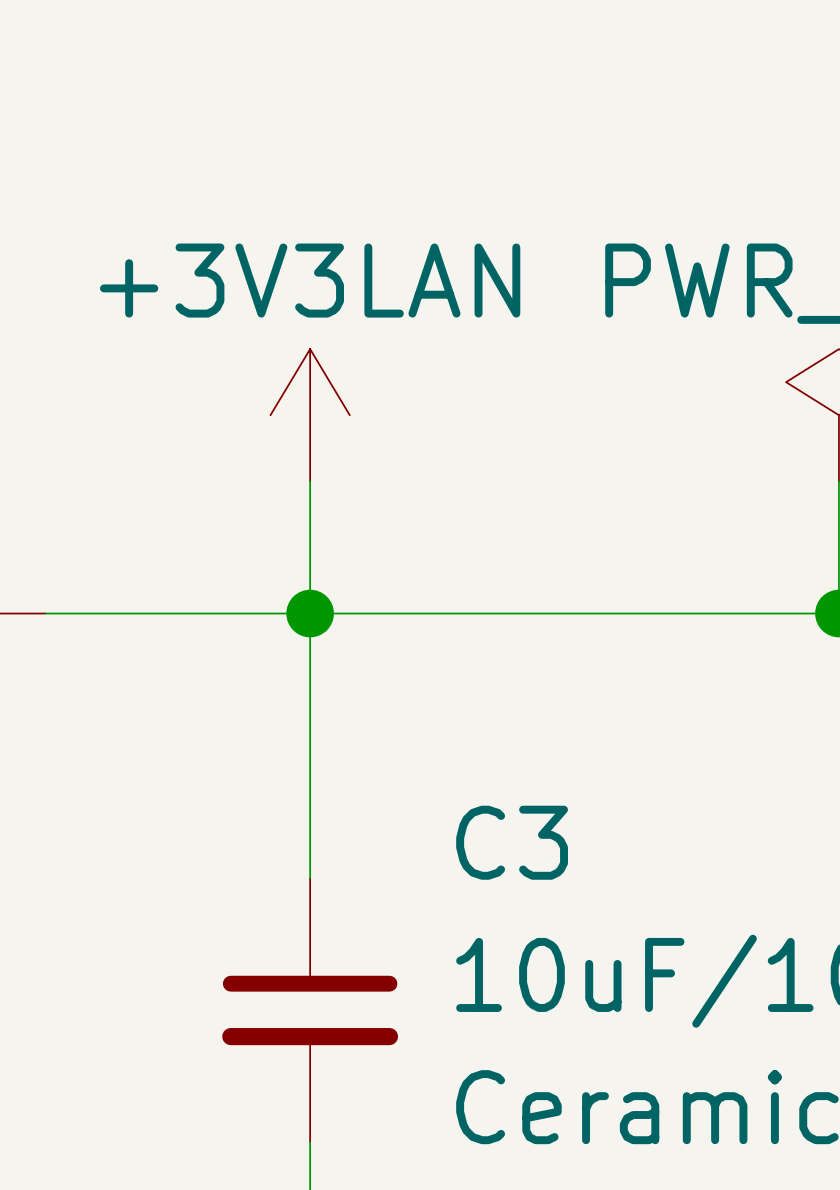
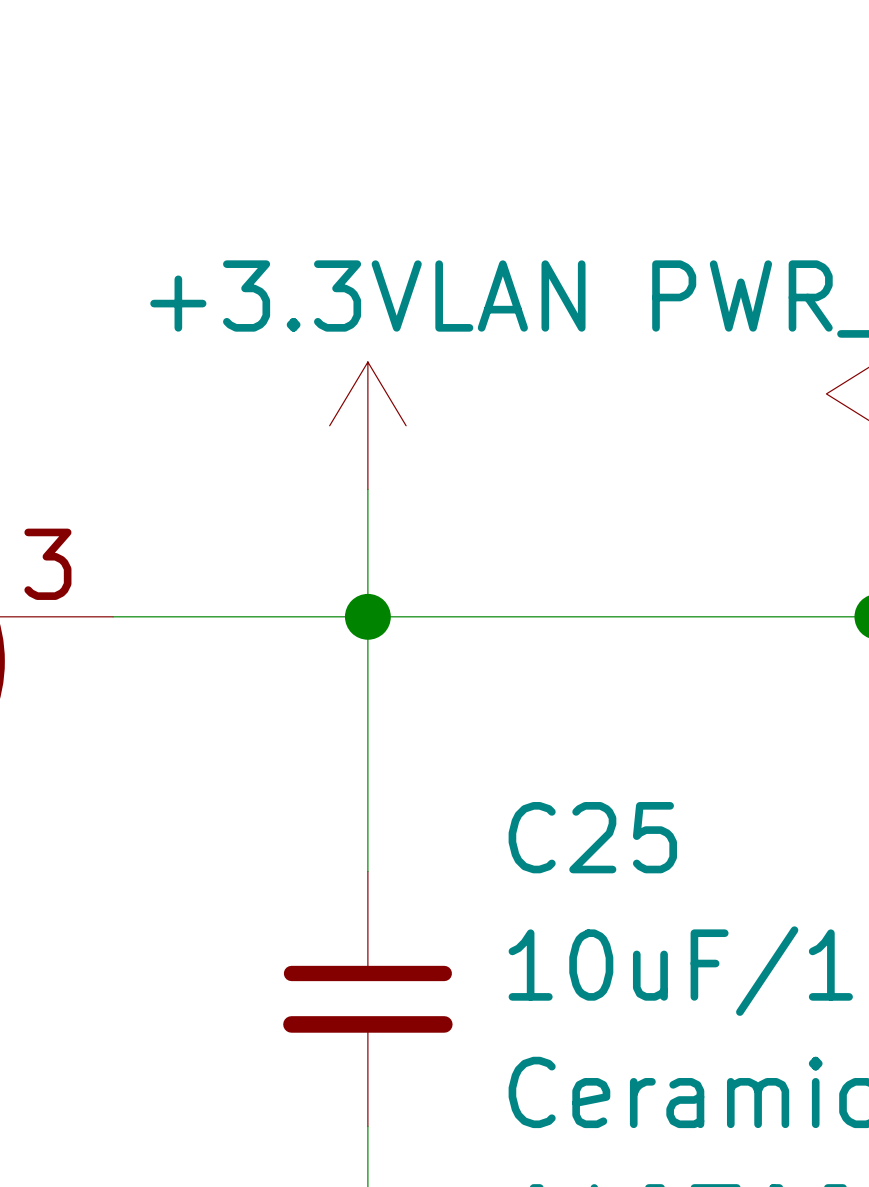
power symbol: +3V3LAN (310, 415) -> +3.3VLAN (367, 425)
C3 name: C3 (512, 842) -> C25 (592, 837)

